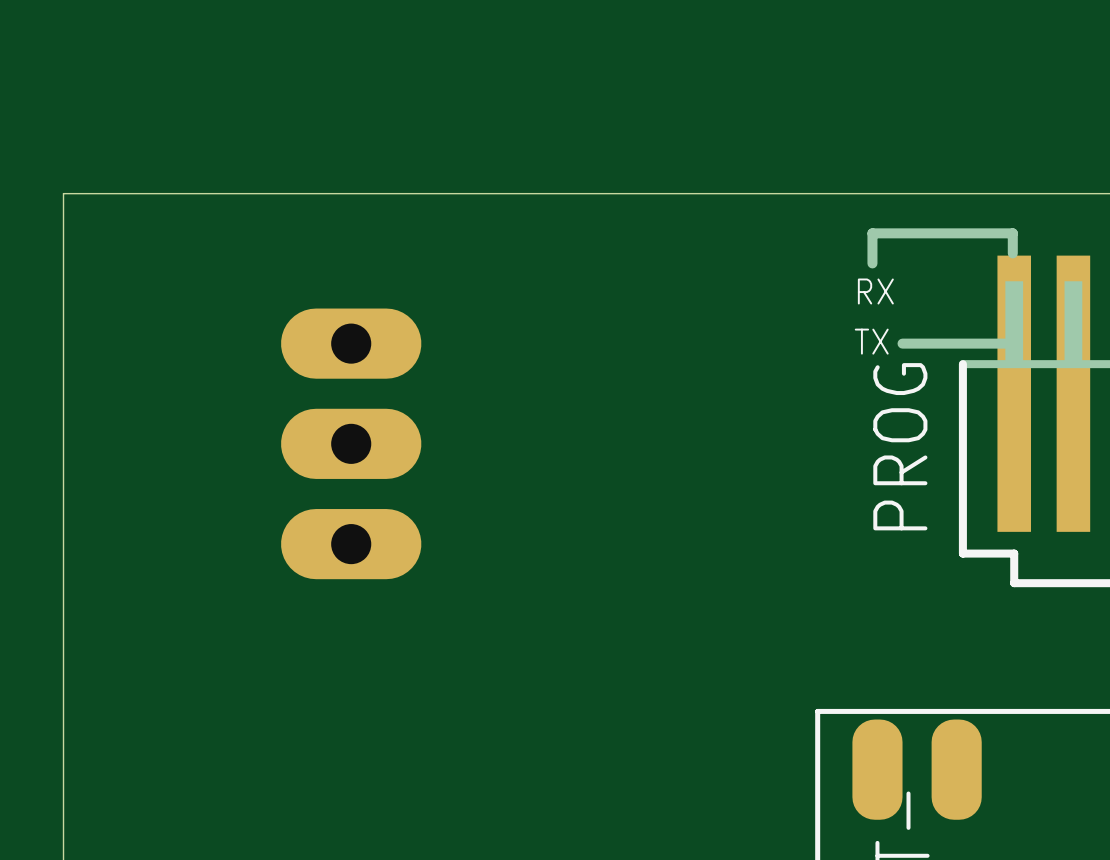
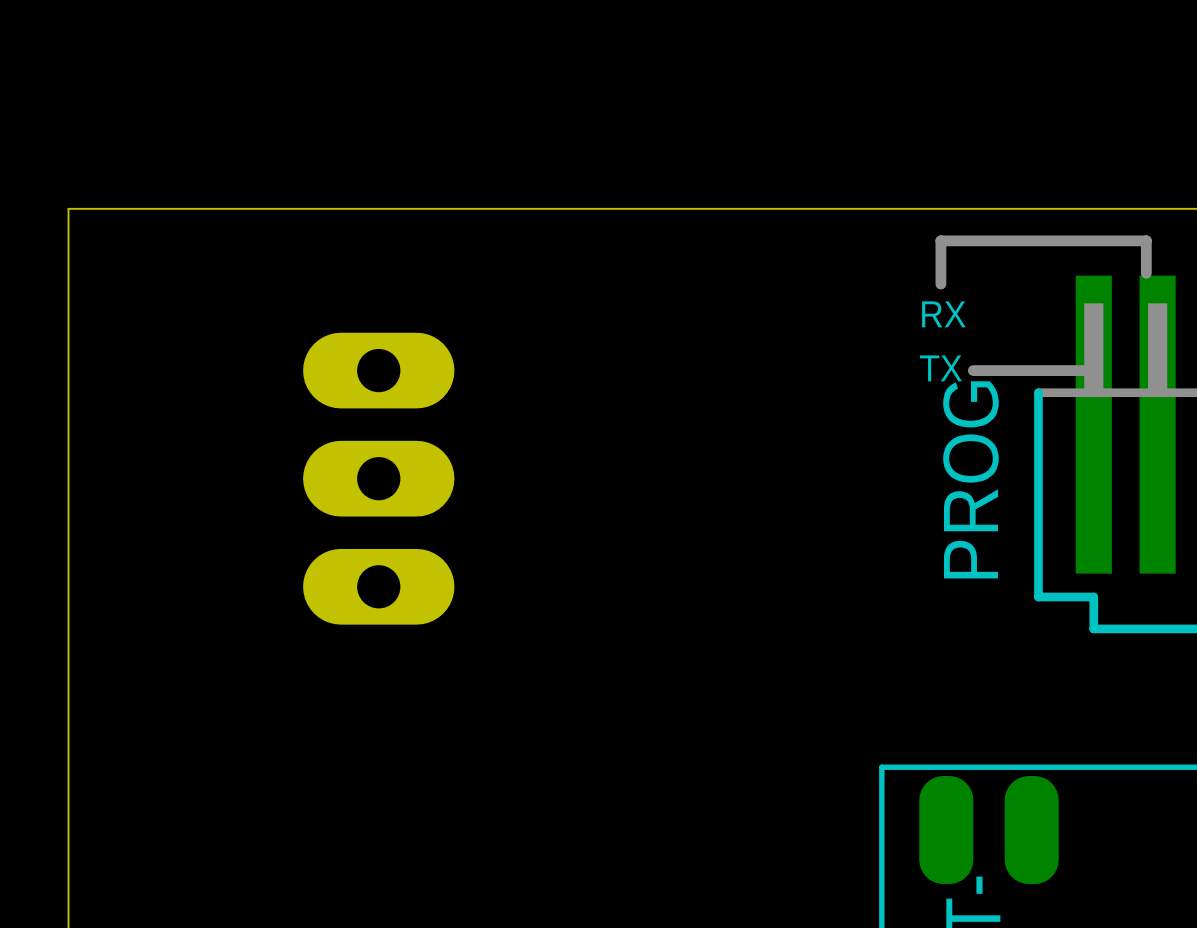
line: (872, 233) (1012, 233) (1012, 253) -> (940, 251) (940, 240) (1146, 240) (1146, 273)

